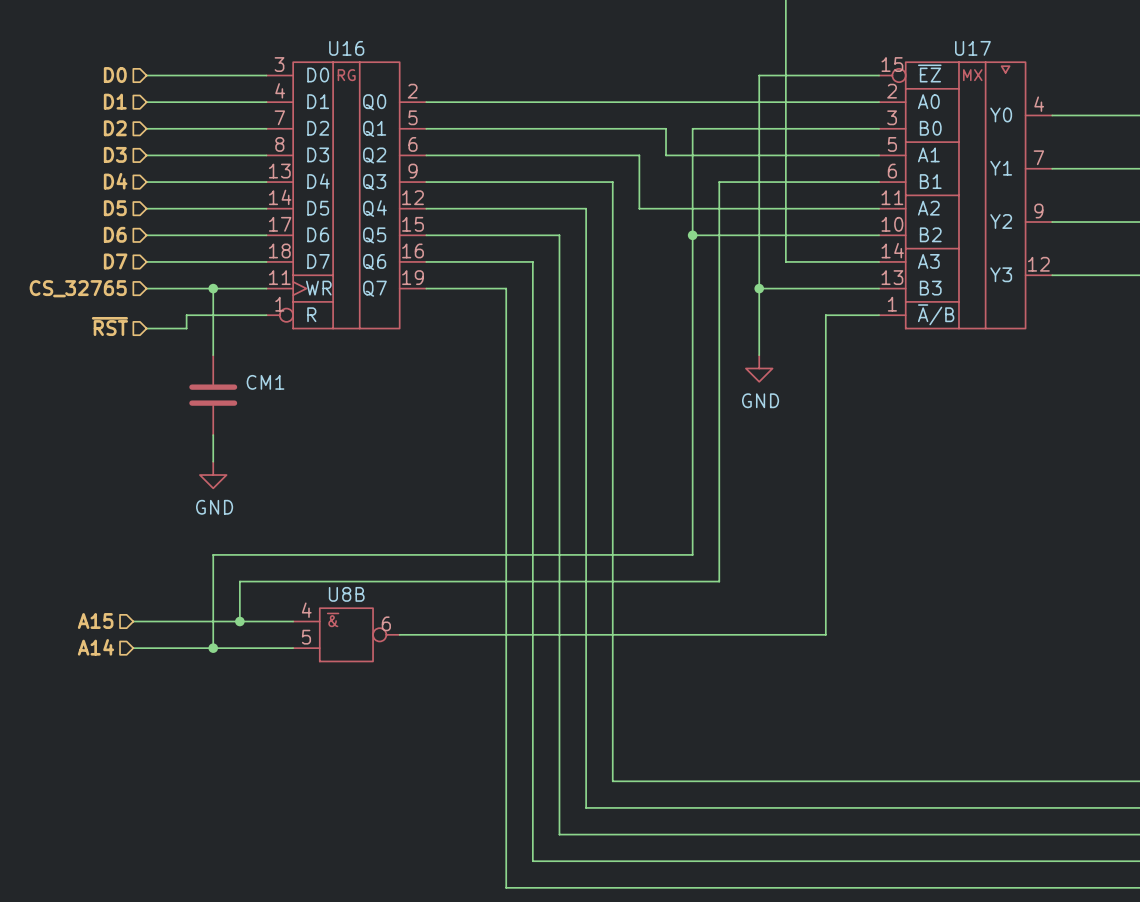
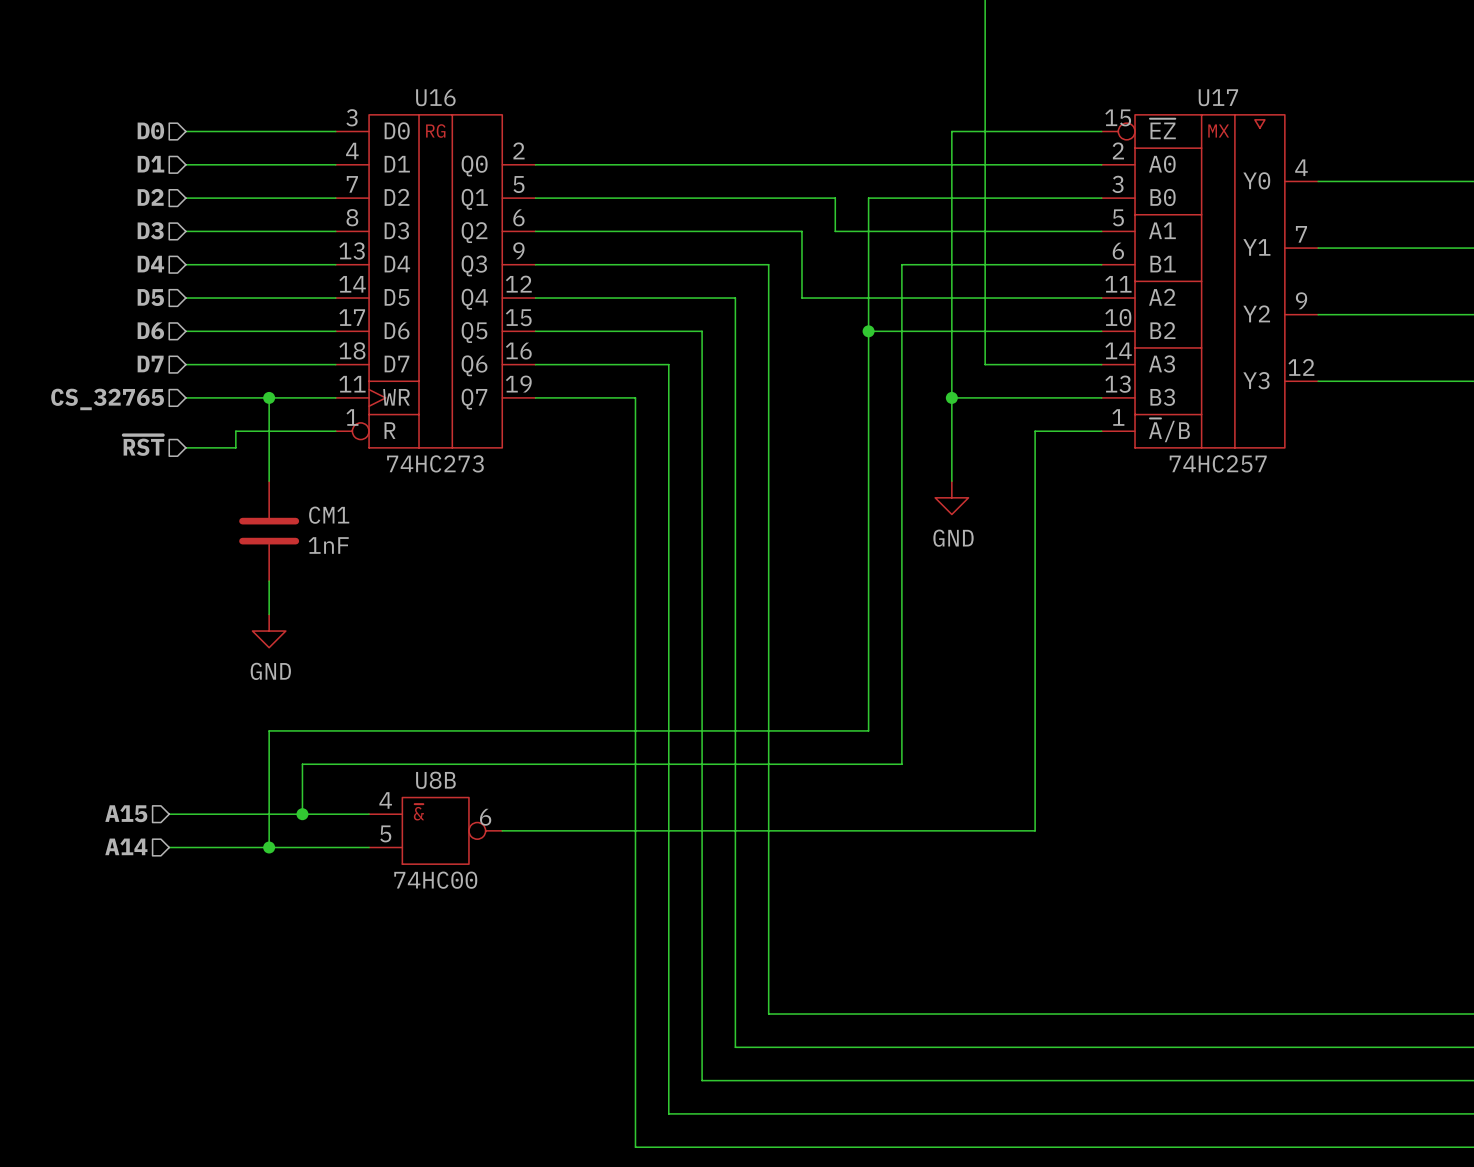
U16 value: none -> 74HC273 (435, 463)
U17 value: none -> 74HC257 (1218, 463)
CM1 value: none -> 1nF (328, 545)
U8B value: none -> 74HC00 (435, 880)

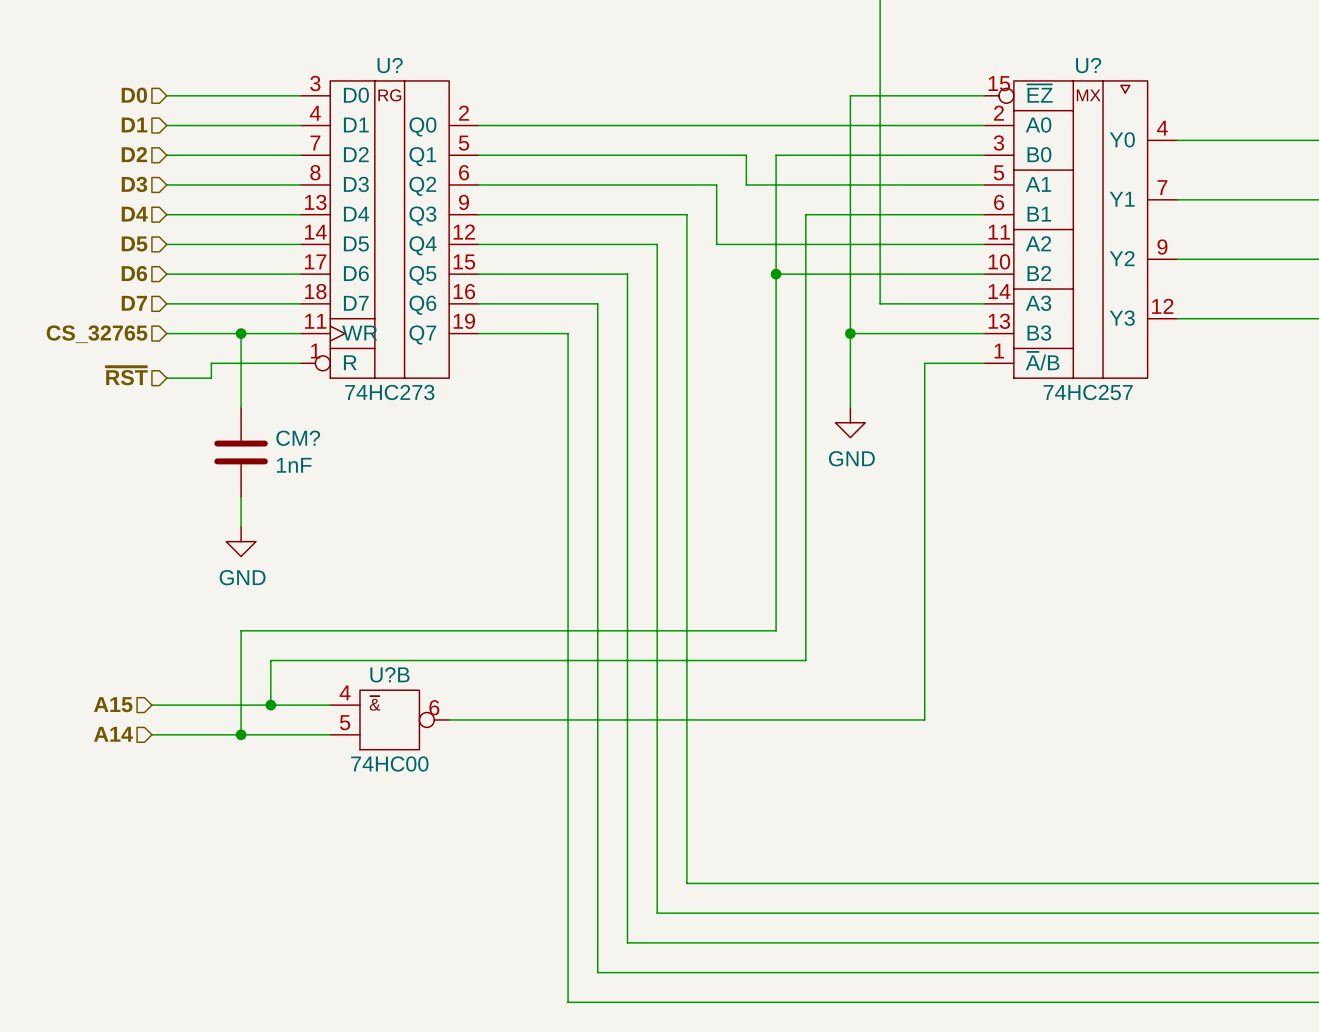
U16 name: U16 (435, 97) -> U? (390, 65)
U17 name: U17 (1218, 97) -> U? (1088, 65)
CM1 name: CM1 (329, 515) -> CM? (298, 438)
U8B name: U8B (435, 780) -> U?B (389, 674)

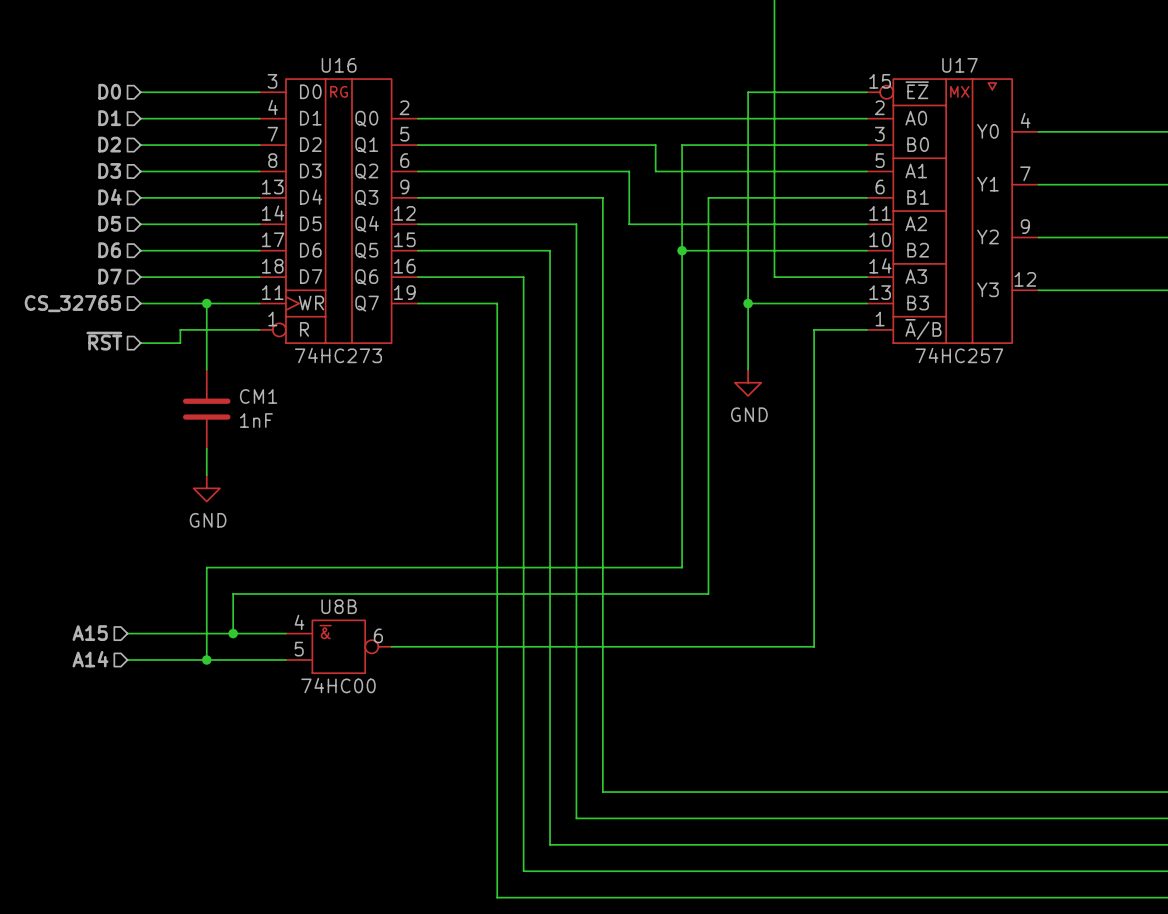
U? name: U? (390, 65) -> U16 (339, 65)
U? name: U? (1088, 65) -> U17 (959, 65)
CM? name: CM? (298, 438) -> CM1 (258, 396)
U?B name: U?B (389, 674) -> U8B (339, 606)

